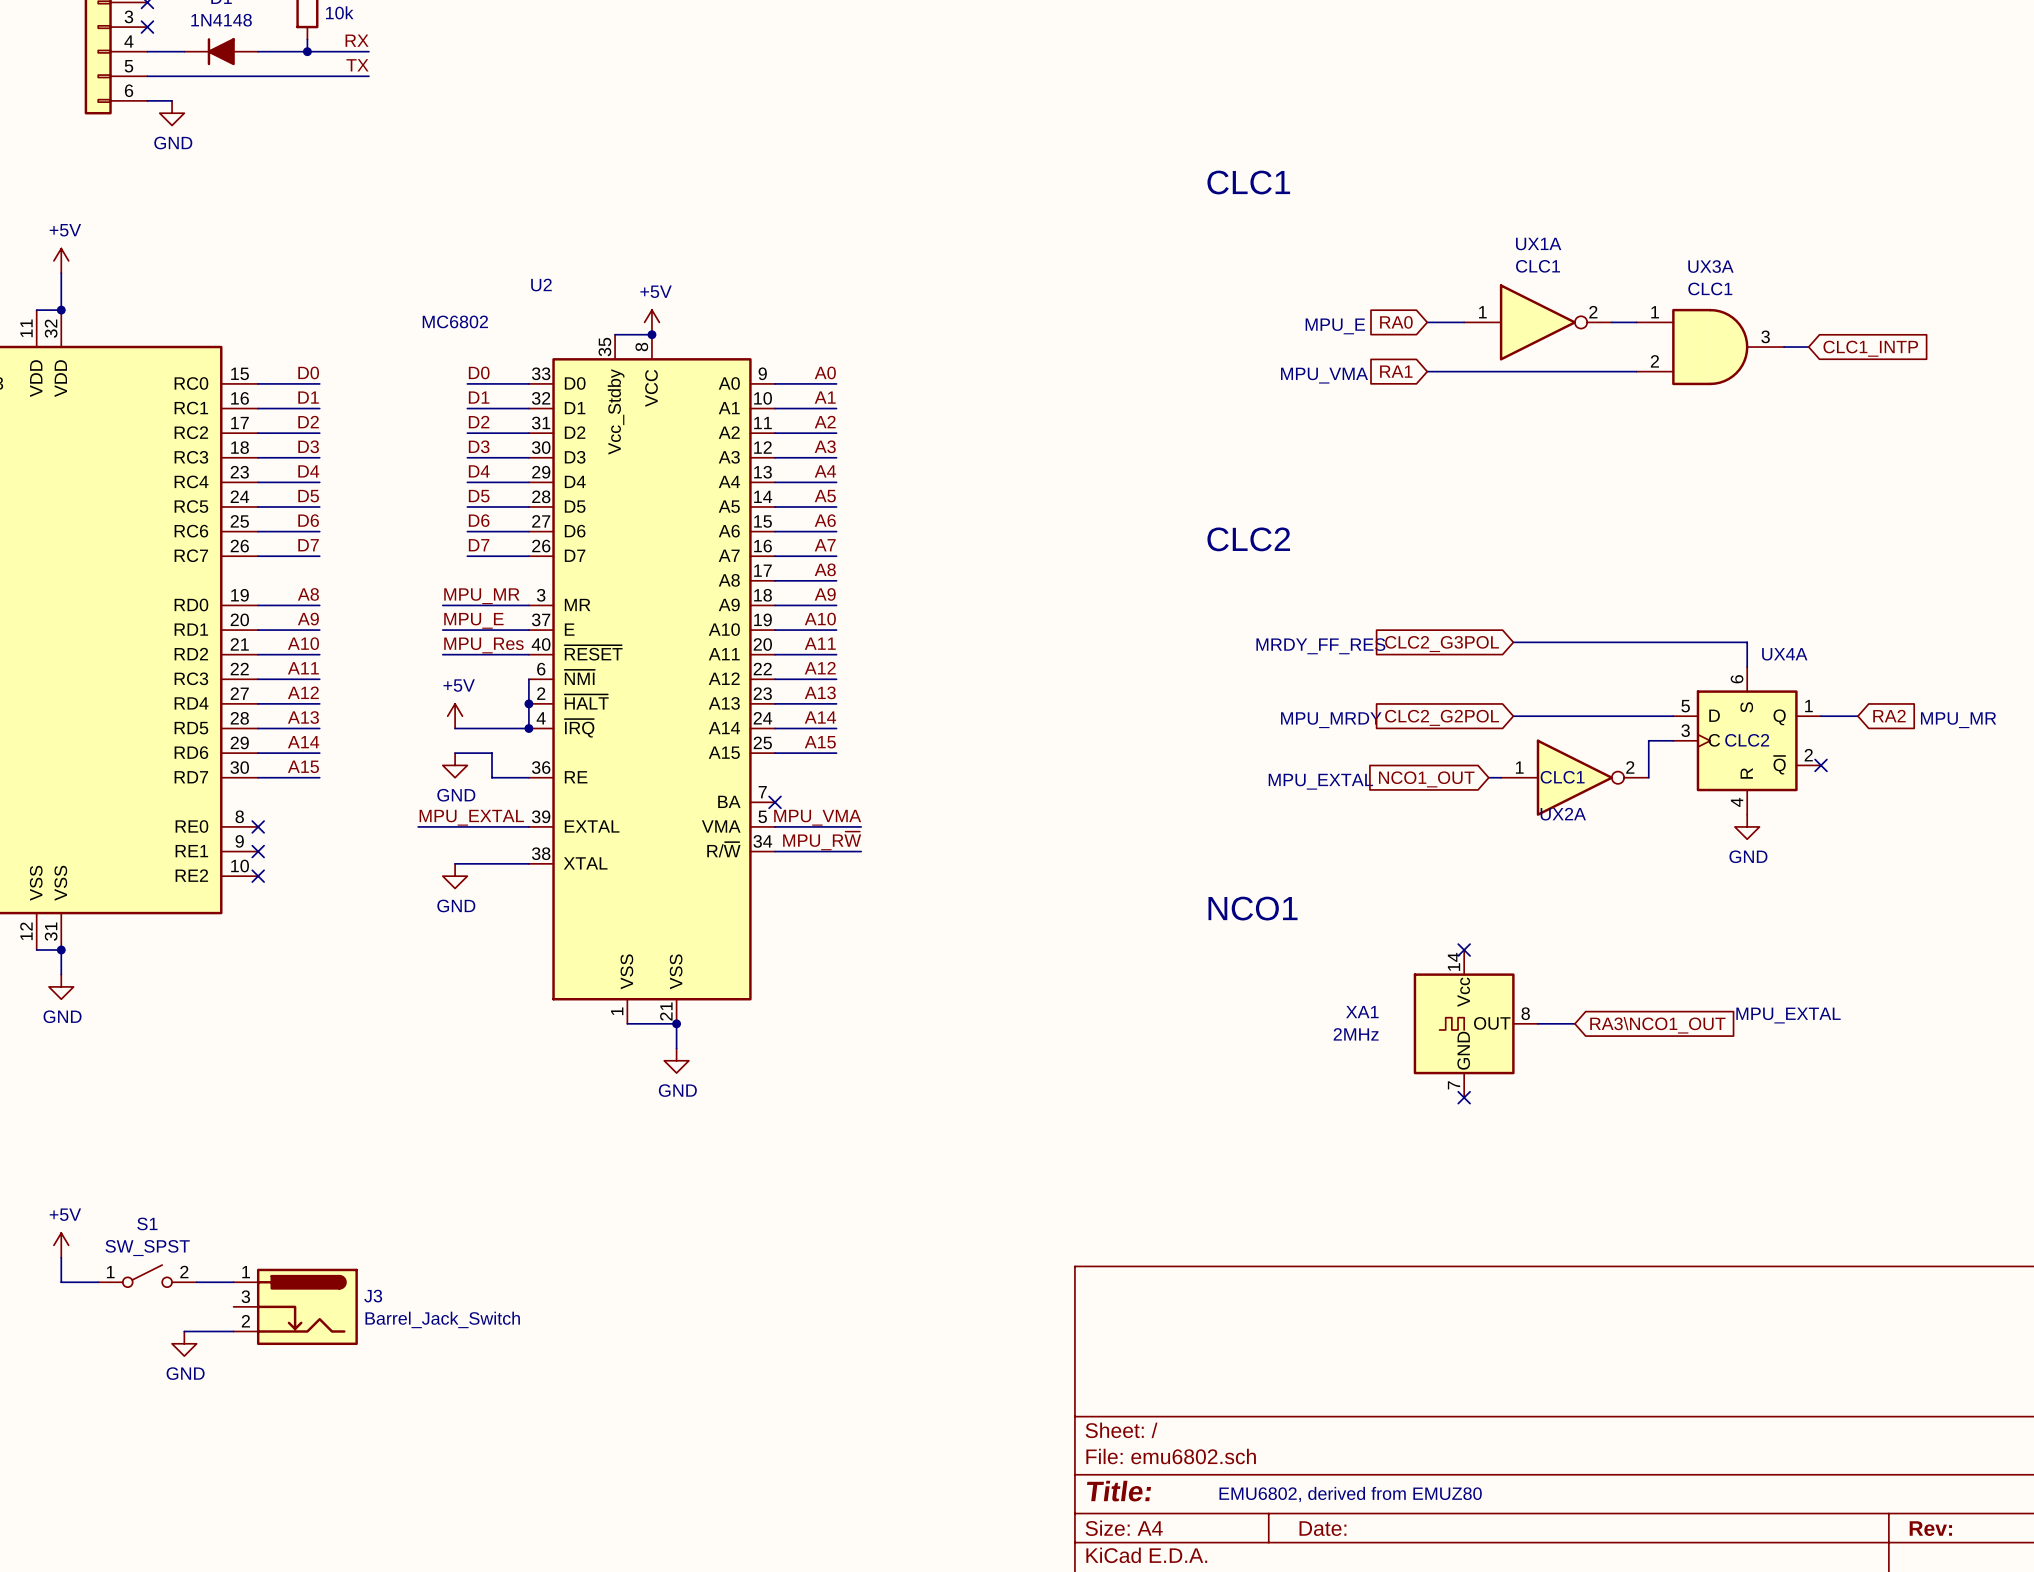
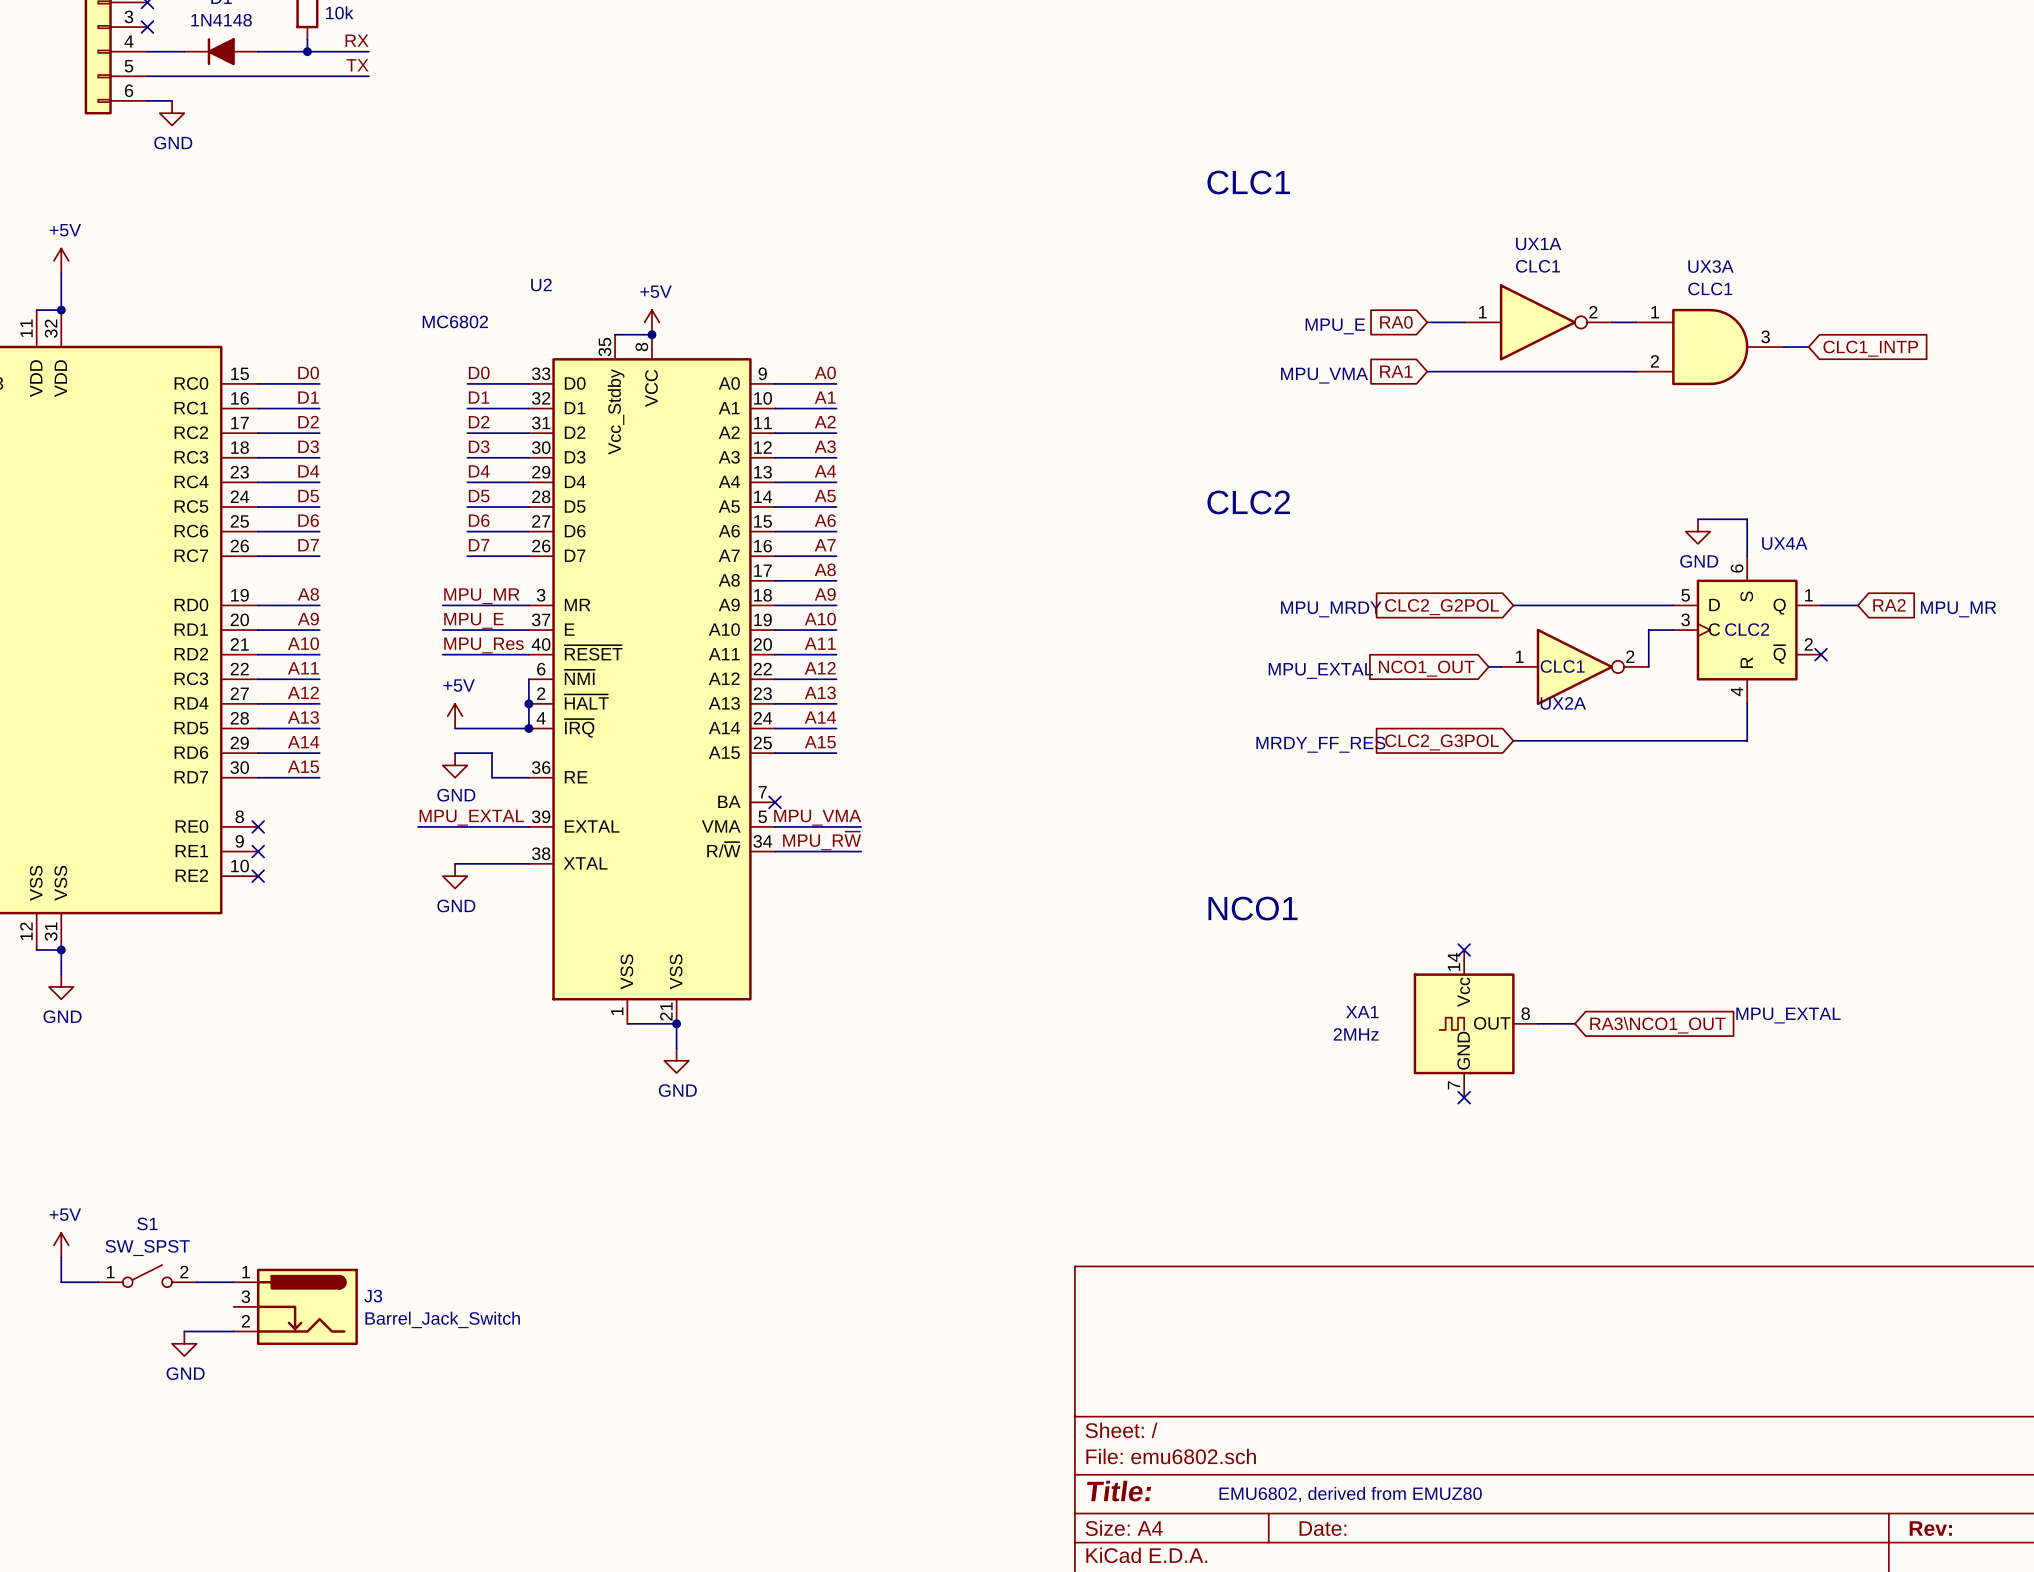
wire: none -> (1697, 519) (1747, 519) (1747, 556)
power symbol: none -> GND (1697, 531)
text position: CLC2 (1248, 539) -> CLC2 (1248, 502)
wire: none -> (1673, 630) (1648, 630) (1648, 666)
wire: (1513, 642) (1747, 642) (1747, 666) -> none
global label position: CLC2_G3POL (1442, 644) -> CLC2_G3POL (1442, 742)
text position: MRDY_FF_RES (1320, 646) -> MRDY_FF_RES (1320, 744)
no-connect mark: none -> (1821, 654)
wire: (1513, 716) (1673, 716) -> (1513, 605) (1673, 605)
wire: (1821, 716) (1857, 716) -> (1821, 605) (1857, 605)
global label position: RA2 (1889, 716) -> RA2 (1889, 605)
global label position: CLC2_G2POL (1442, 717) -> CLC2_G2POL (1442, 607)
text position: MPU_MRDY (1331, 720) -> MPU_MRDY (1331, 609)
text position: MPU_MR (1958, 720) -> MPU_MR (1958, 609)
wire: (1648, 740) (1648, 777) -> (1648, 740) (1513, 740)
UX4A position: (1747, 740) -> (1747, 630)
no-connect mark: (1821, 765) -> none
wire: (1488, 777) (1501, 777) -> (1488, 666) (1501, 666)
UX2A position: (1574, 777) -> (1574, 666)
global label position: NCO1_OUT (1426, 779) -> NCO1_OUT (1426, 668)
text position: MPU_EXTAL (1320, 781) -> MPU_EXTAL (1320, 670)
power symbol: GND (1747, 826) -> none

